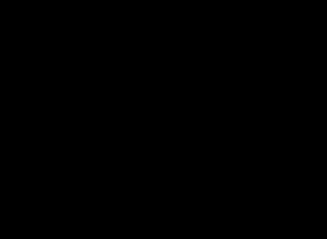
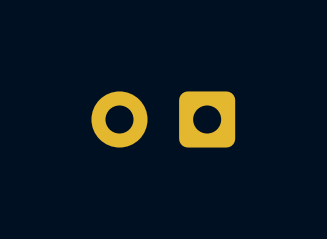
part: none -> (163, 119)

